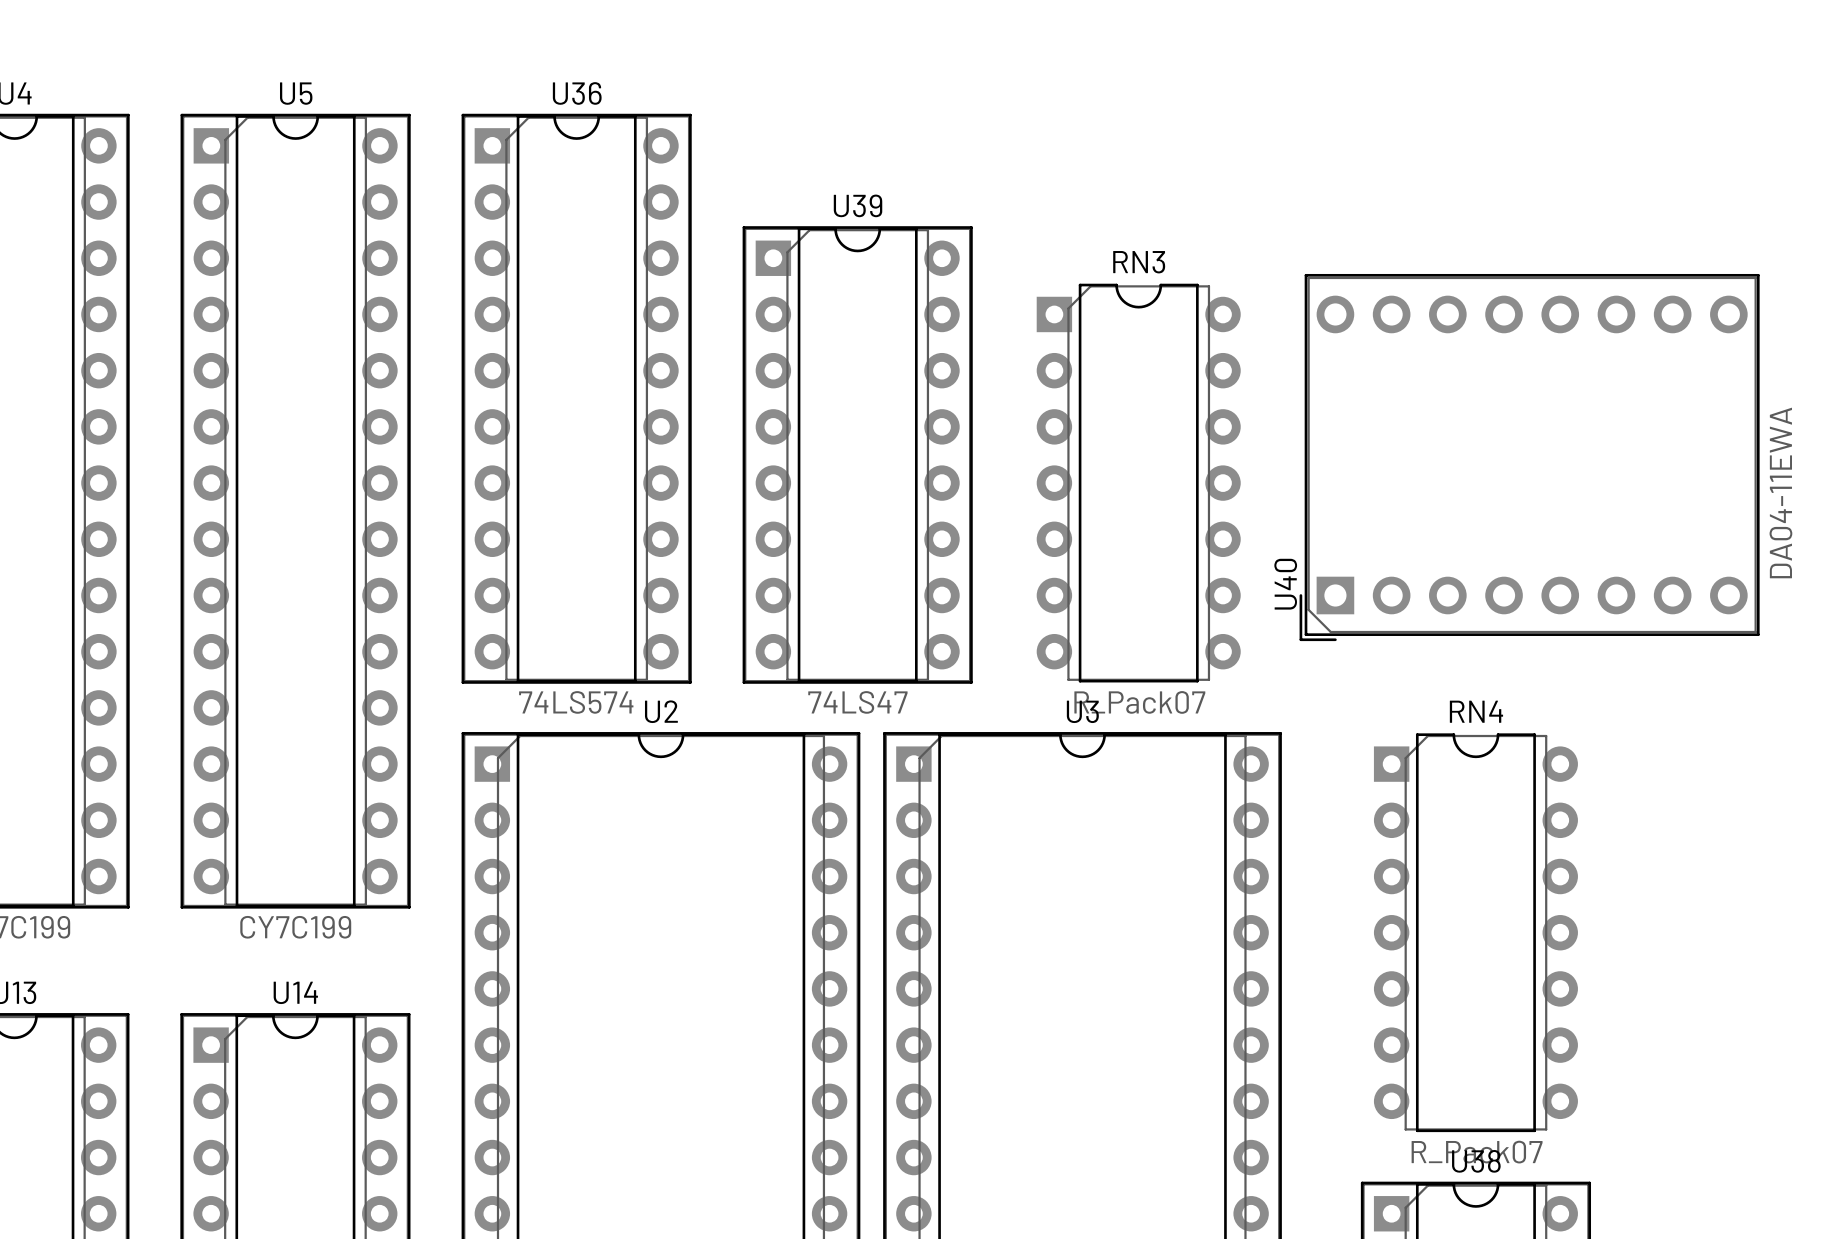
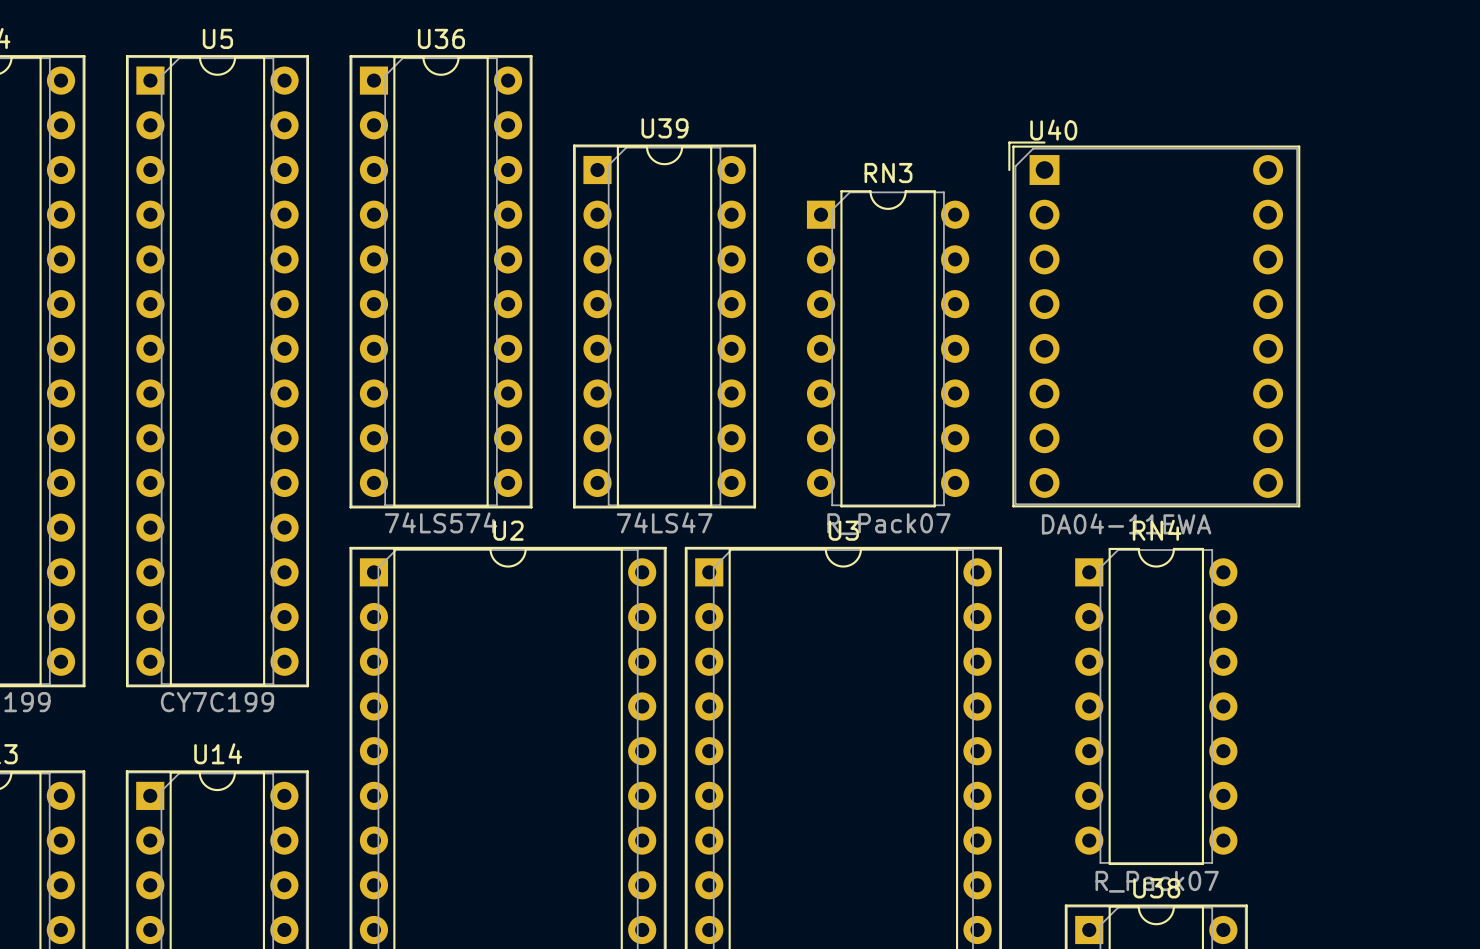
U40 rotation: 0° (1529, 457) -> 90° clockwise (1154, 324)

